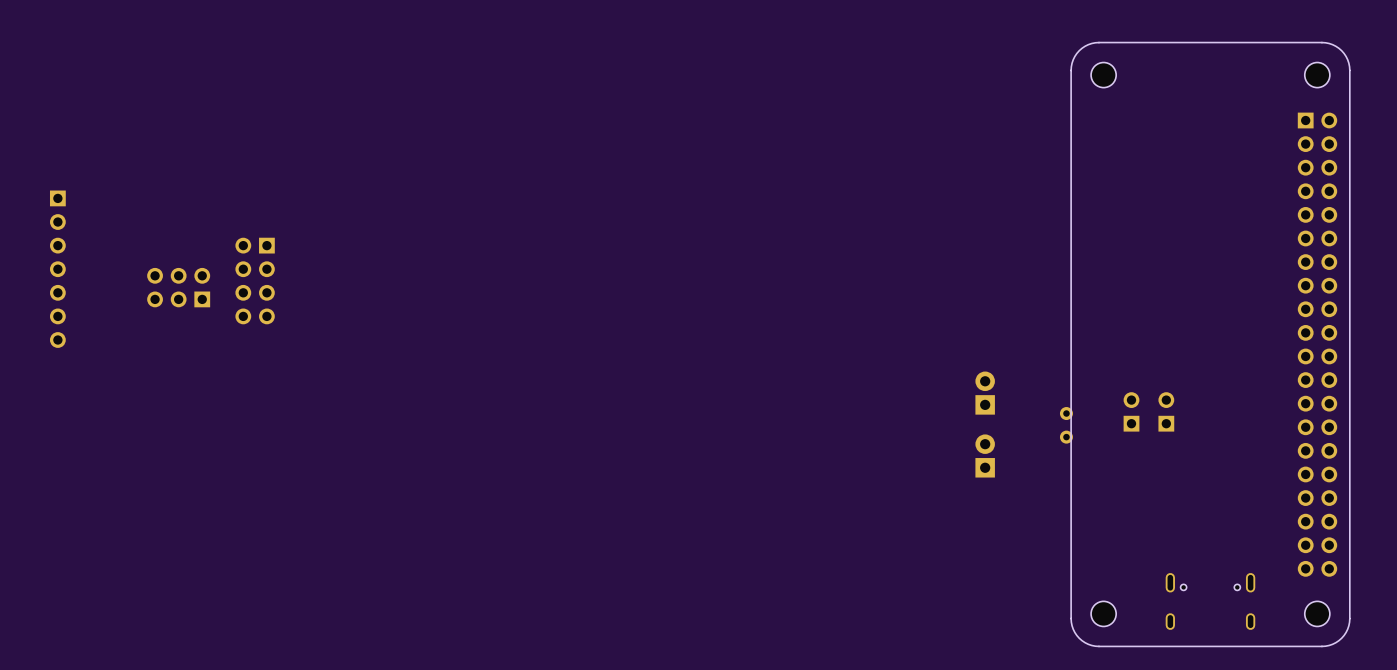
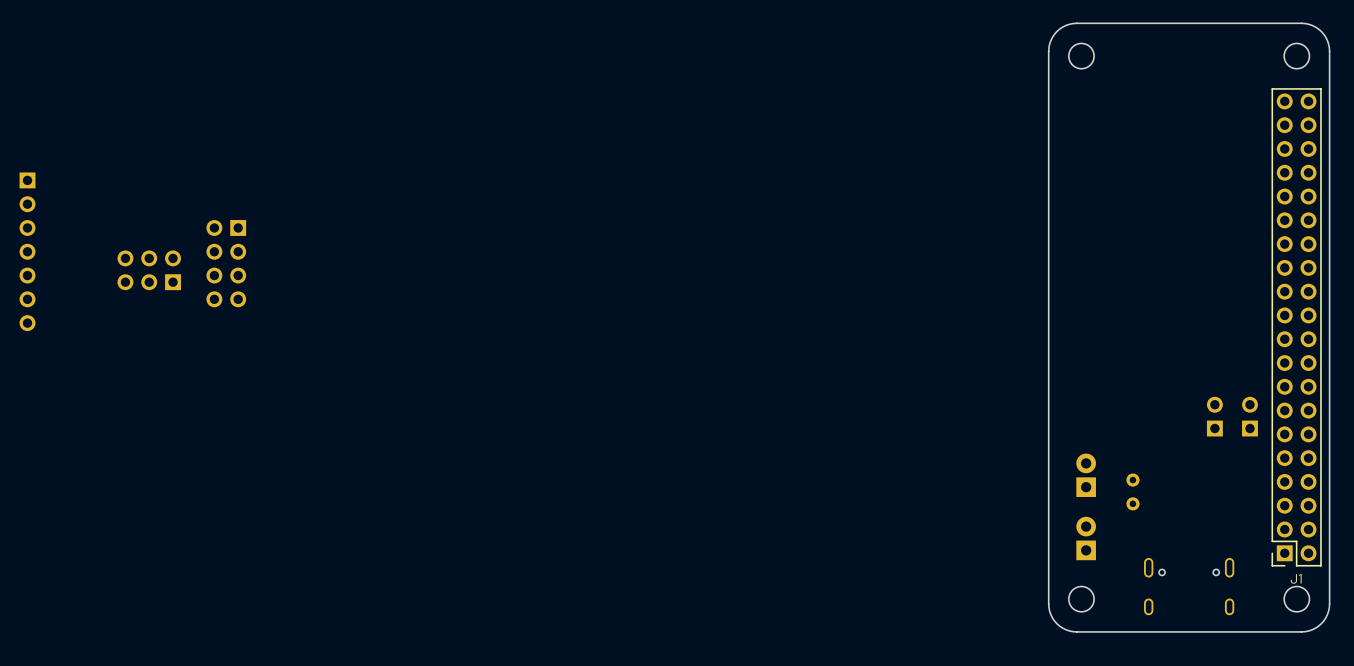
J1 side: top (1317, 344) -> bottom (1296, 327)
part: (985, 393) -> none
part: (1131, 411) -> none
part: (1166, 411) -> none
part position: (1066, 425) -> (1132, 491)
part: none -> (1214, 416)
part: none -> (1250, 416)
part: (985, 455) -> none
part: none -> (1086, 475)
part: none -> (1086, 538)

